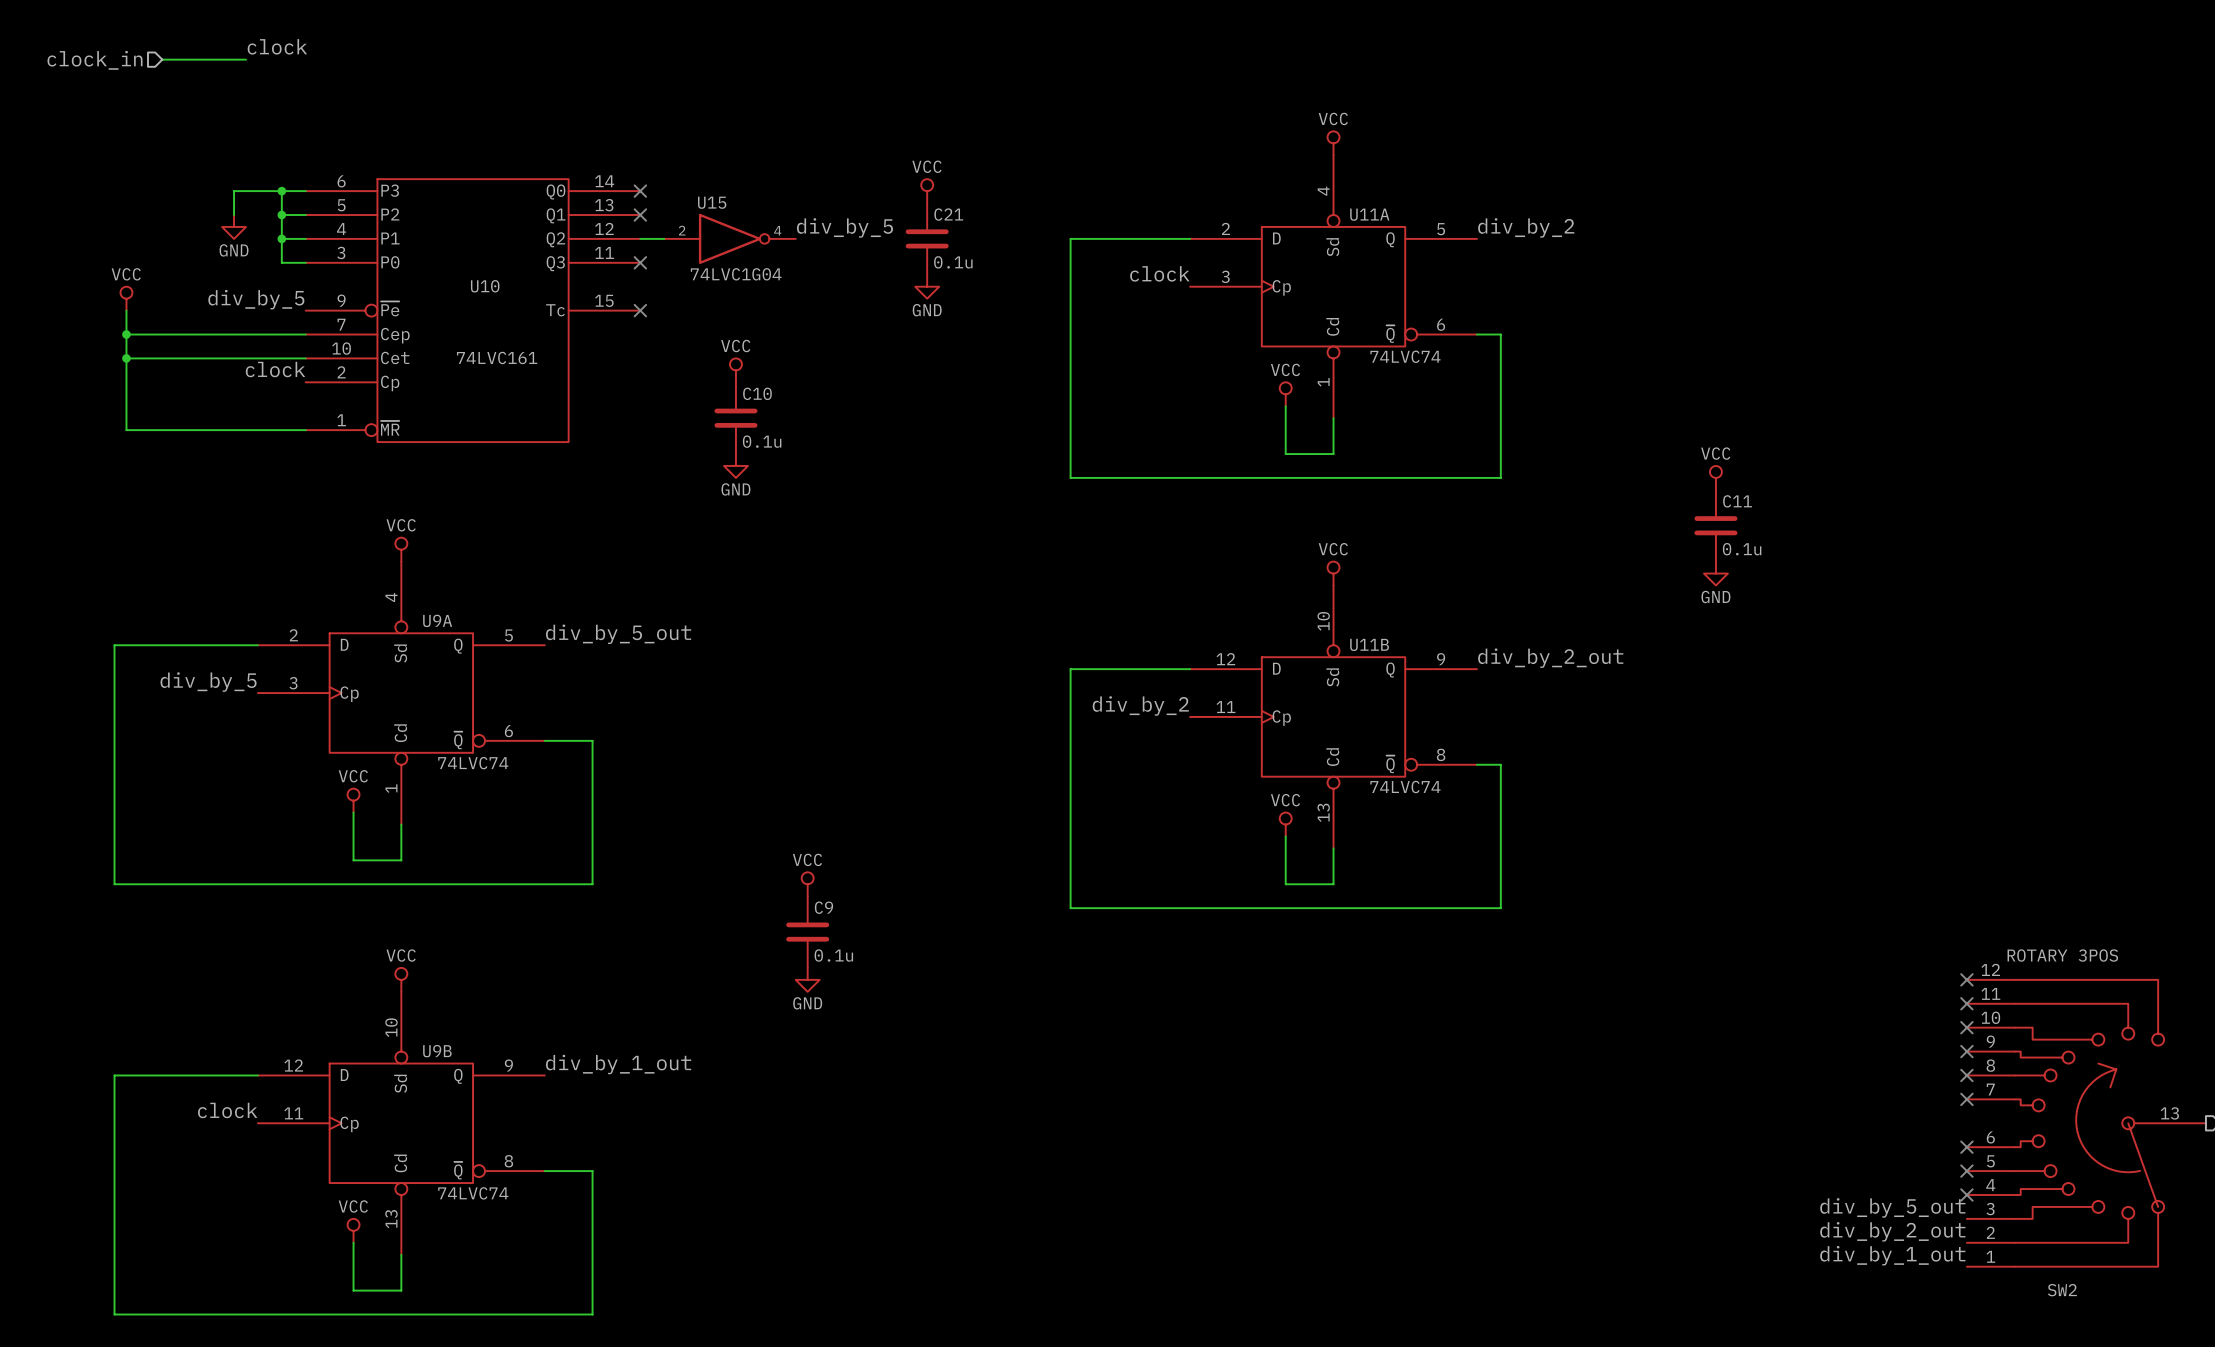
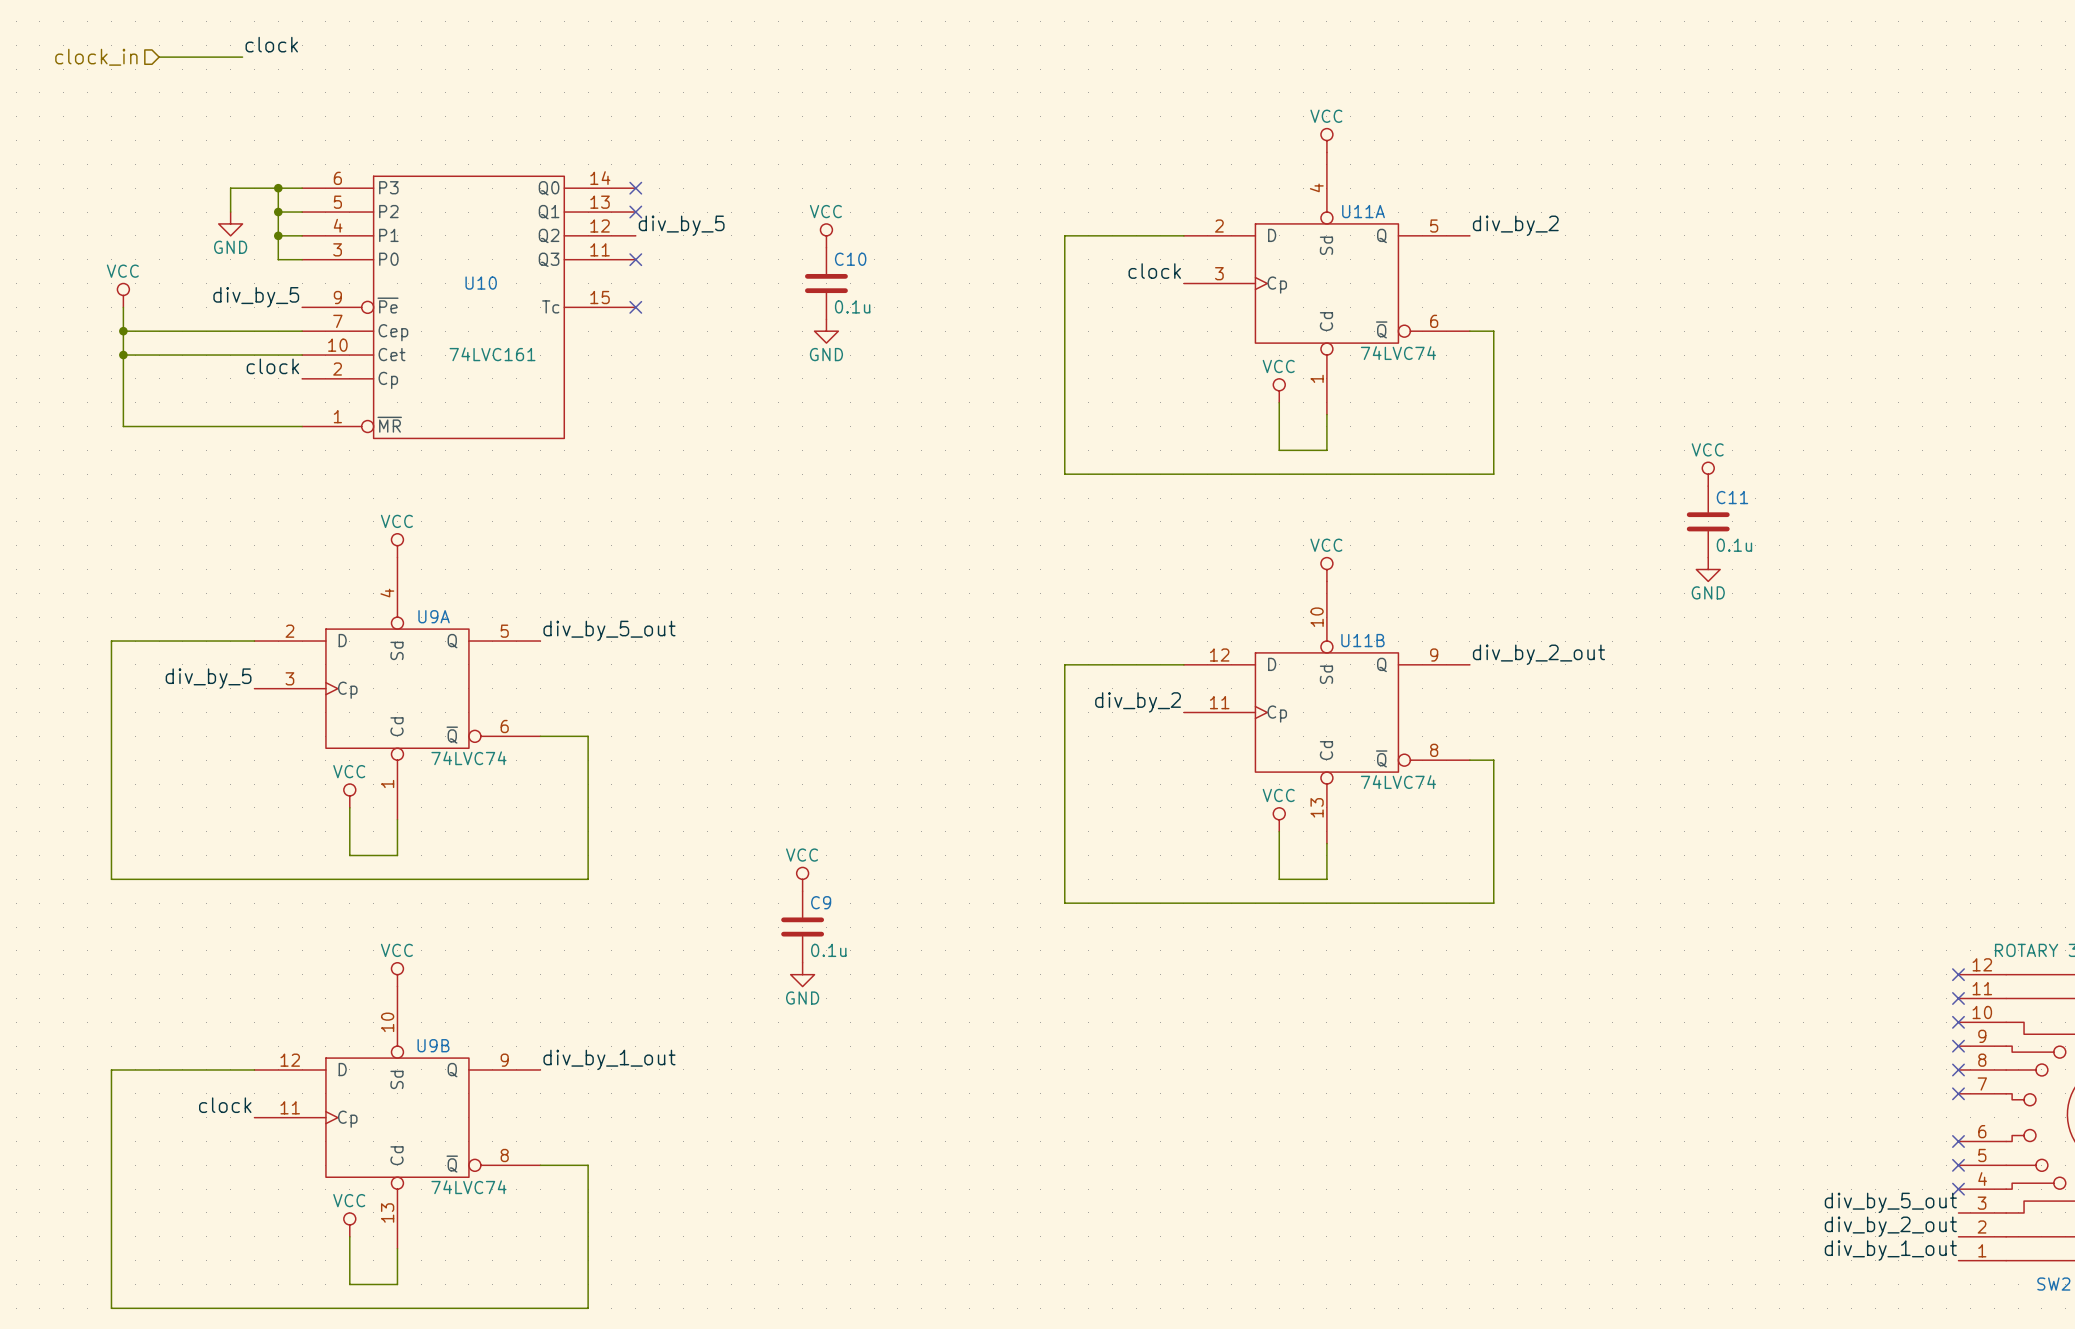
power symbol: VCC (927, 191) -> none
label position: div_by_5 (844, 227) -> div_by_5 (681, 225)
wire: (640, 238) (664, 238) -> none
U15: 74LVC1G04 (729, 238) -> none
power symbol: none -> VCC (826, 235)
C21: 0.1u (927, 238) -> none
power symbol: GND (927, 286) -> none
power symbol: none -> GND (826, 331)
power symbol: VCC (735, 370) -> none
C10 position: (735, 418) -> (826, 283)
power symbol: GND (735, 465) -> none

